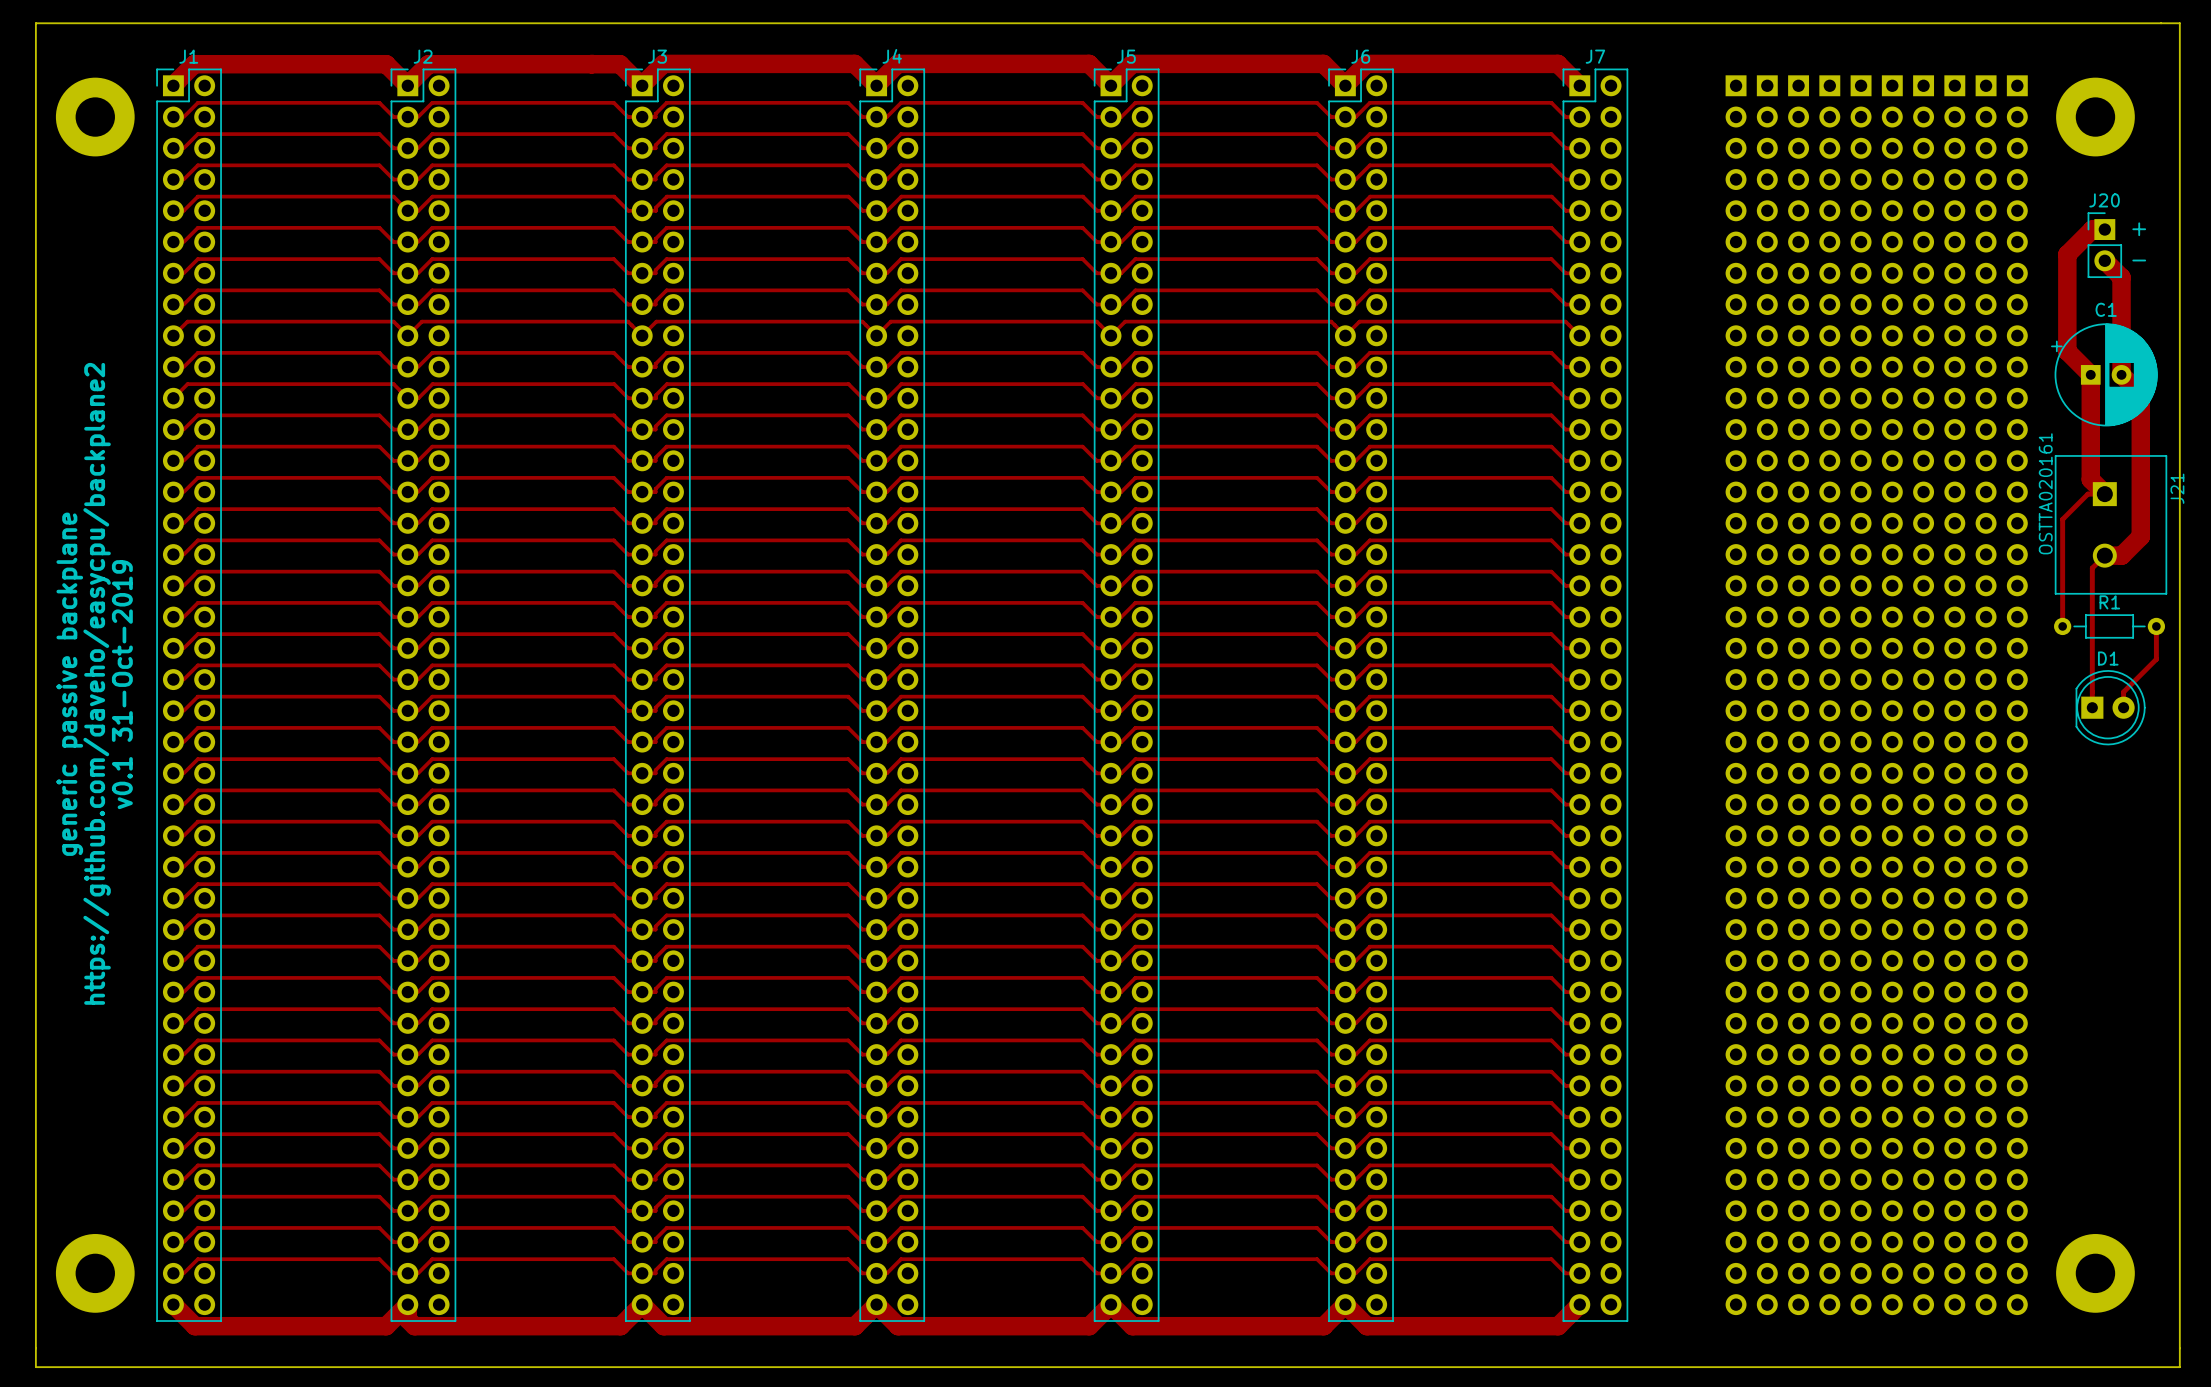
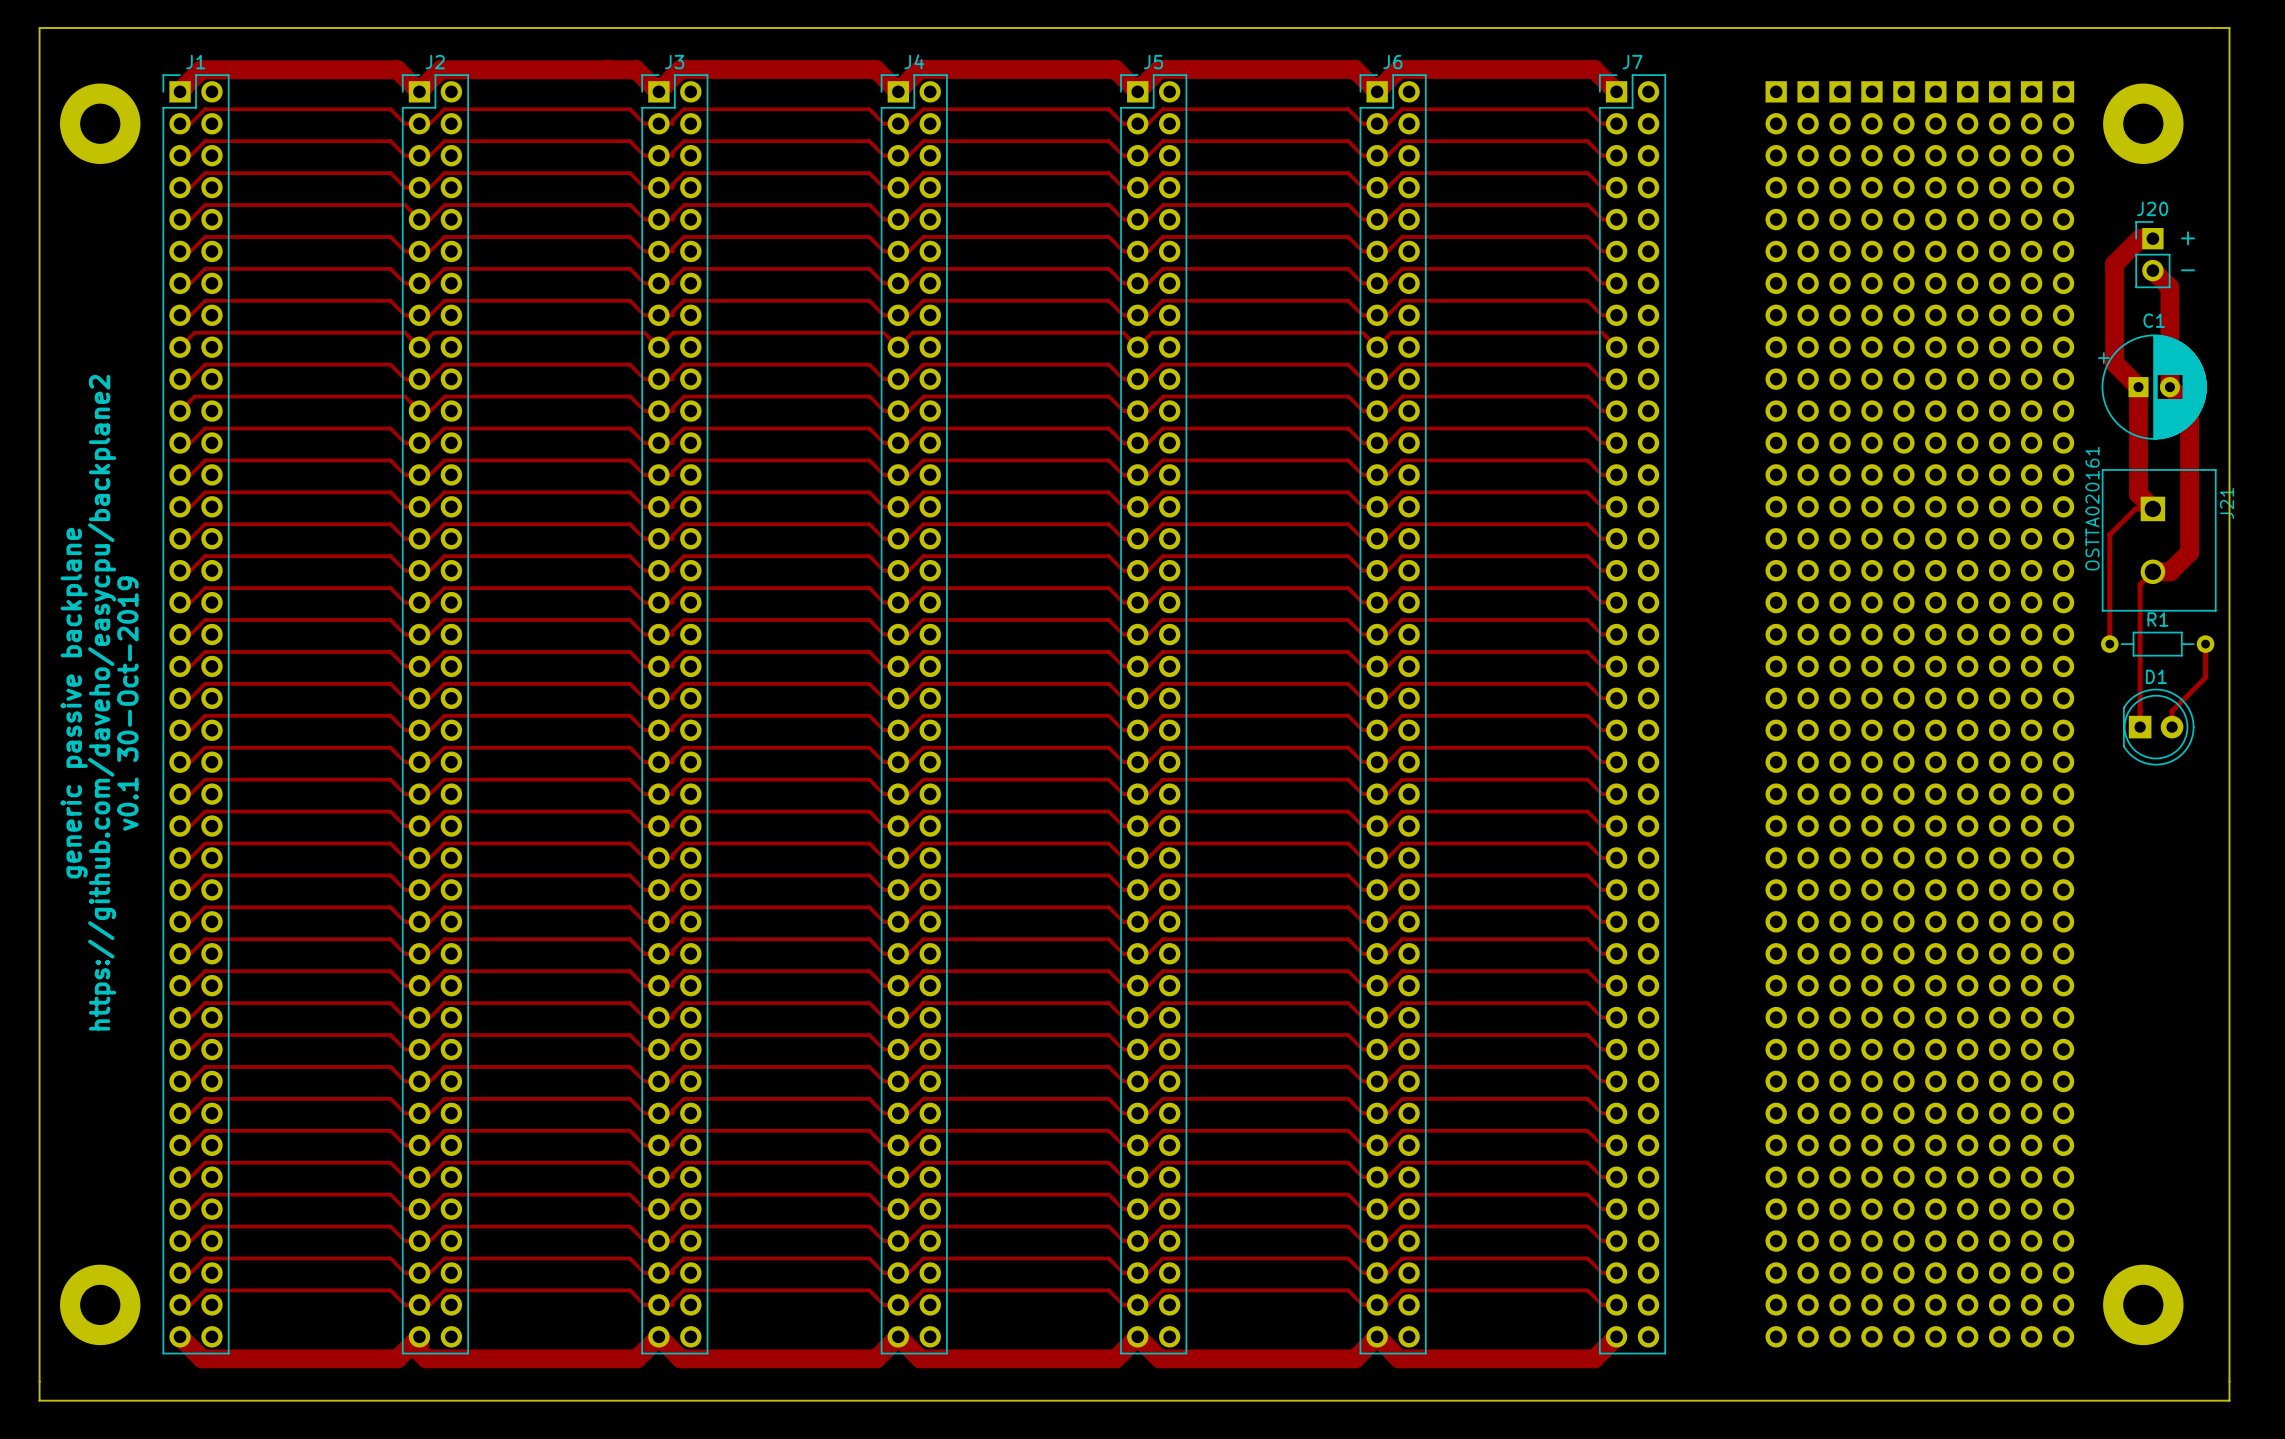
text: v0.1 31-Oct-2019 (122, 684) -> v0.1 30-Oct-2019 (127, 703)

